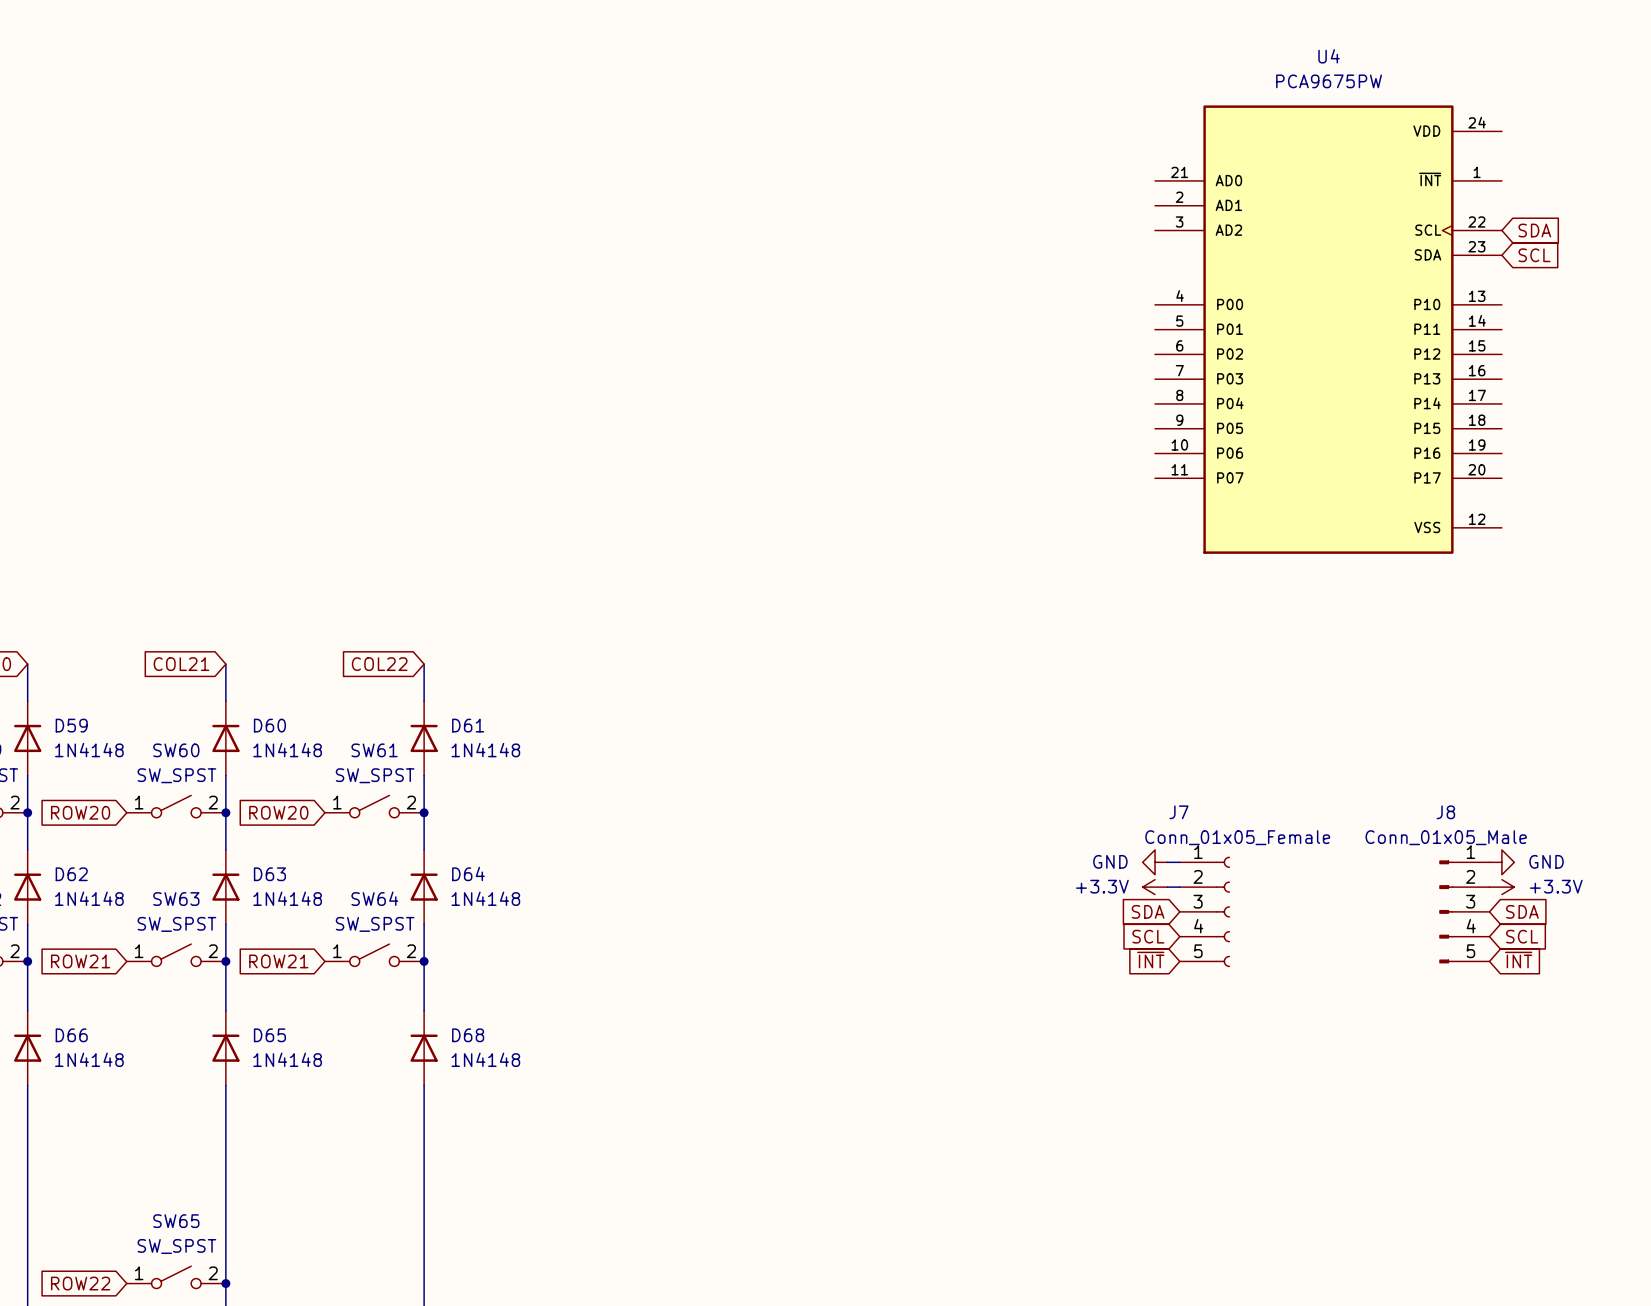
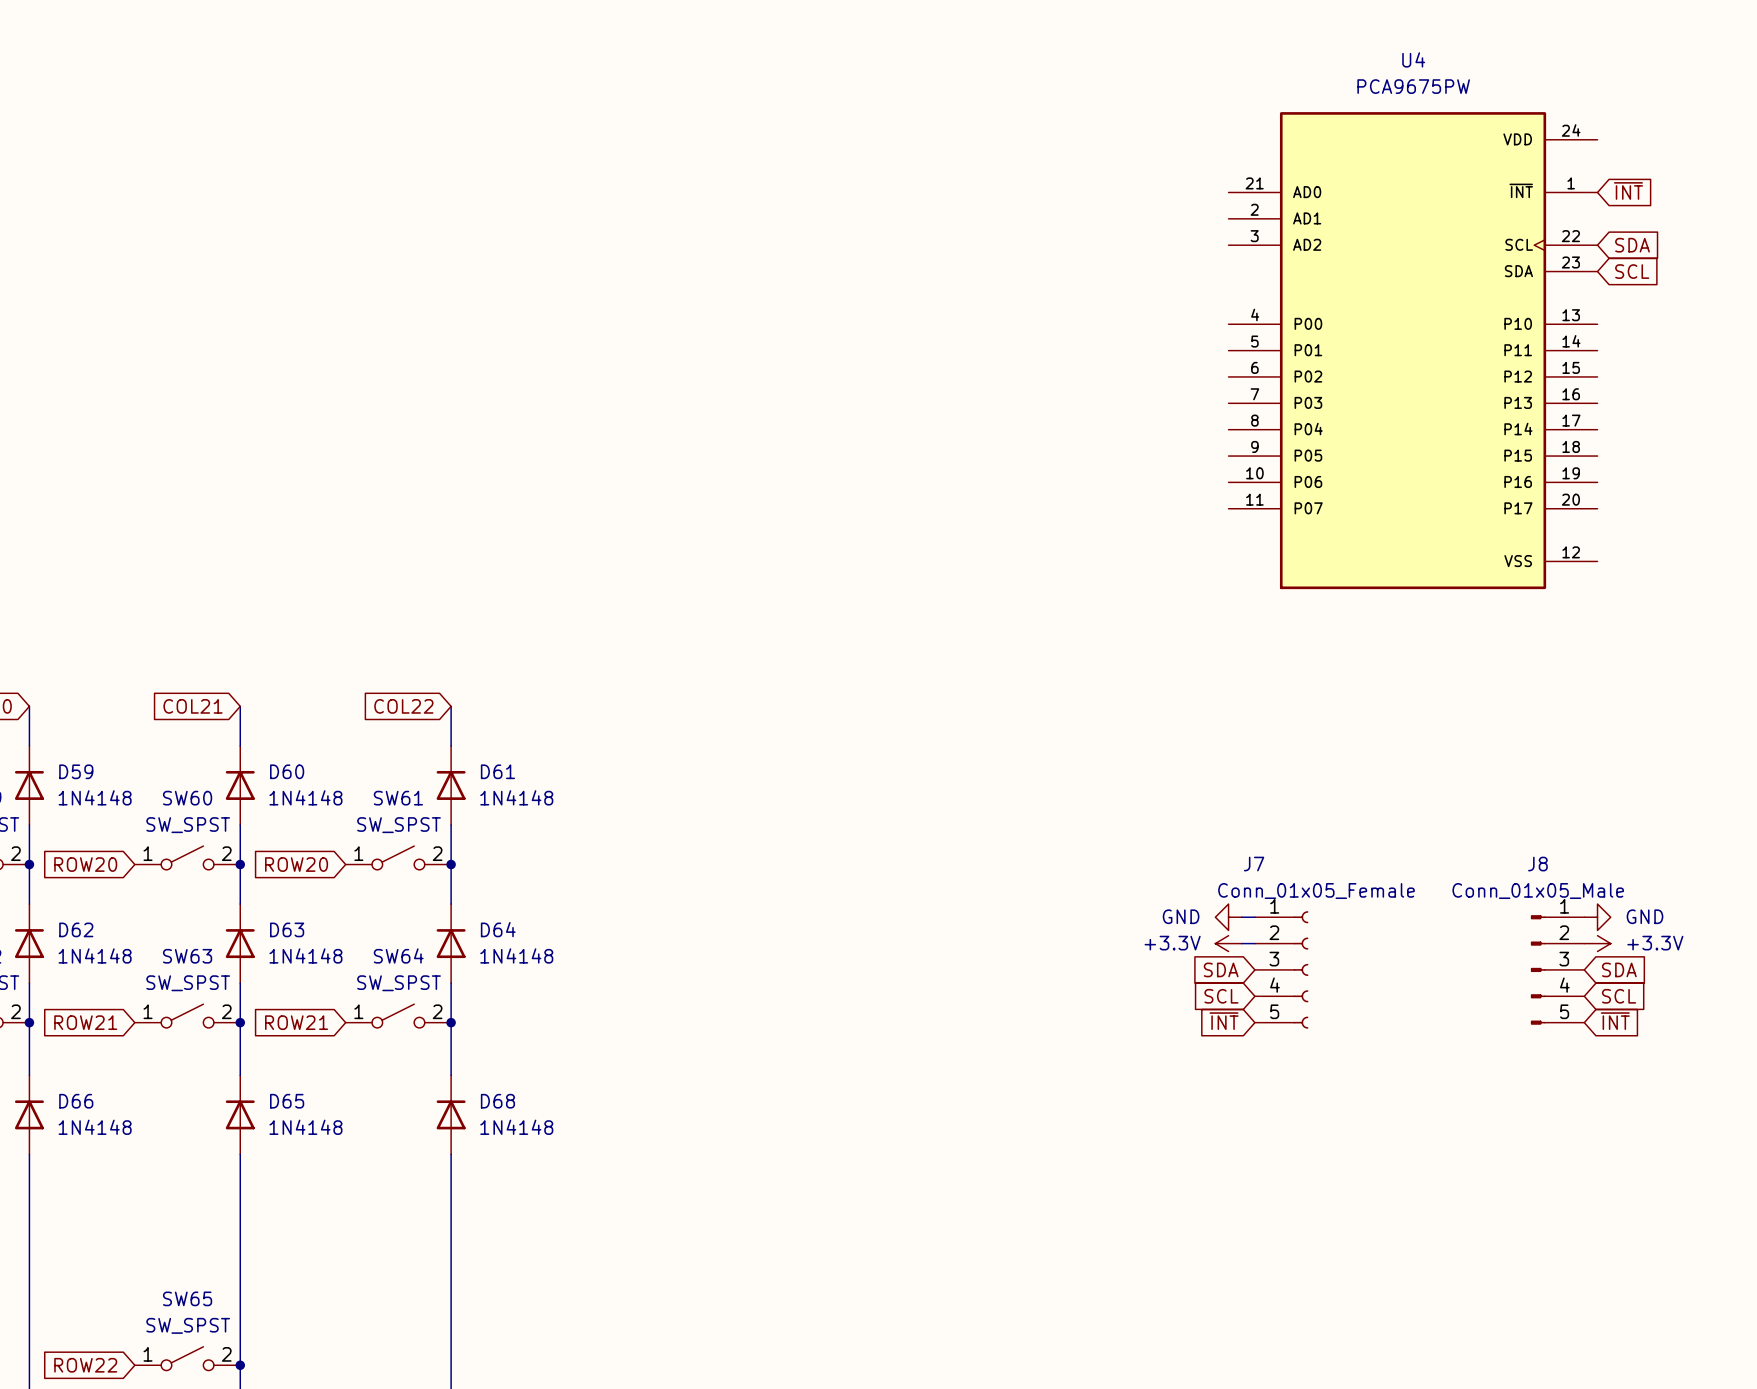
global label: none -> ~{INT} (1628, 190)

